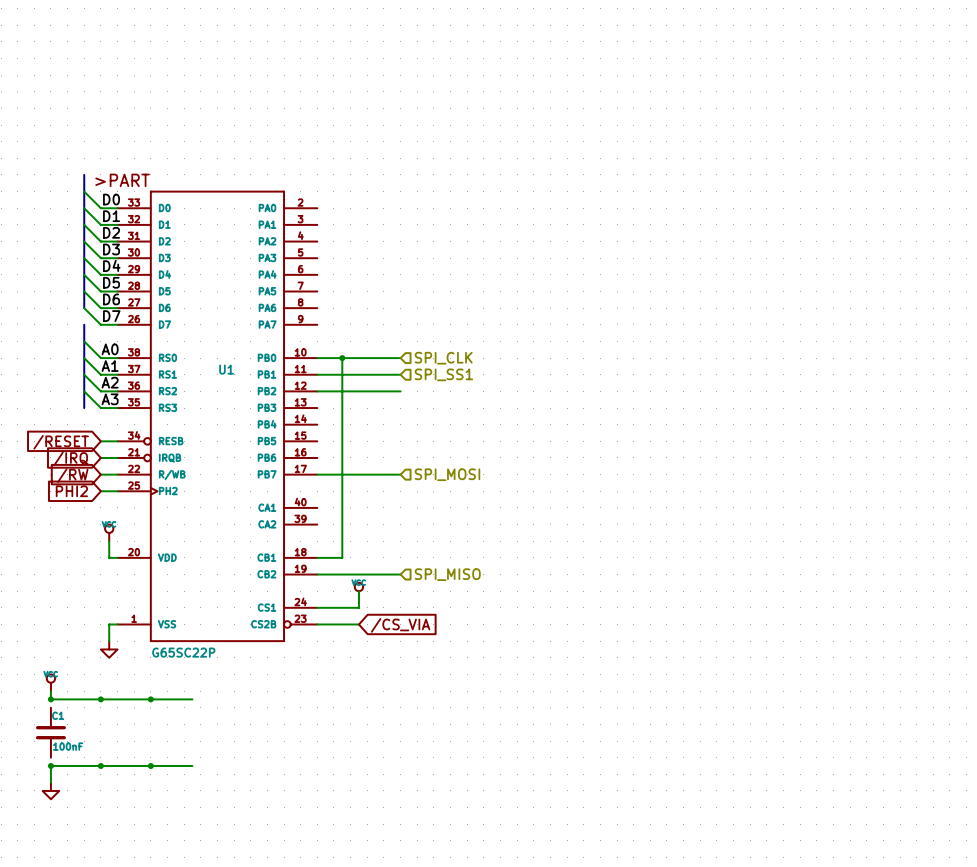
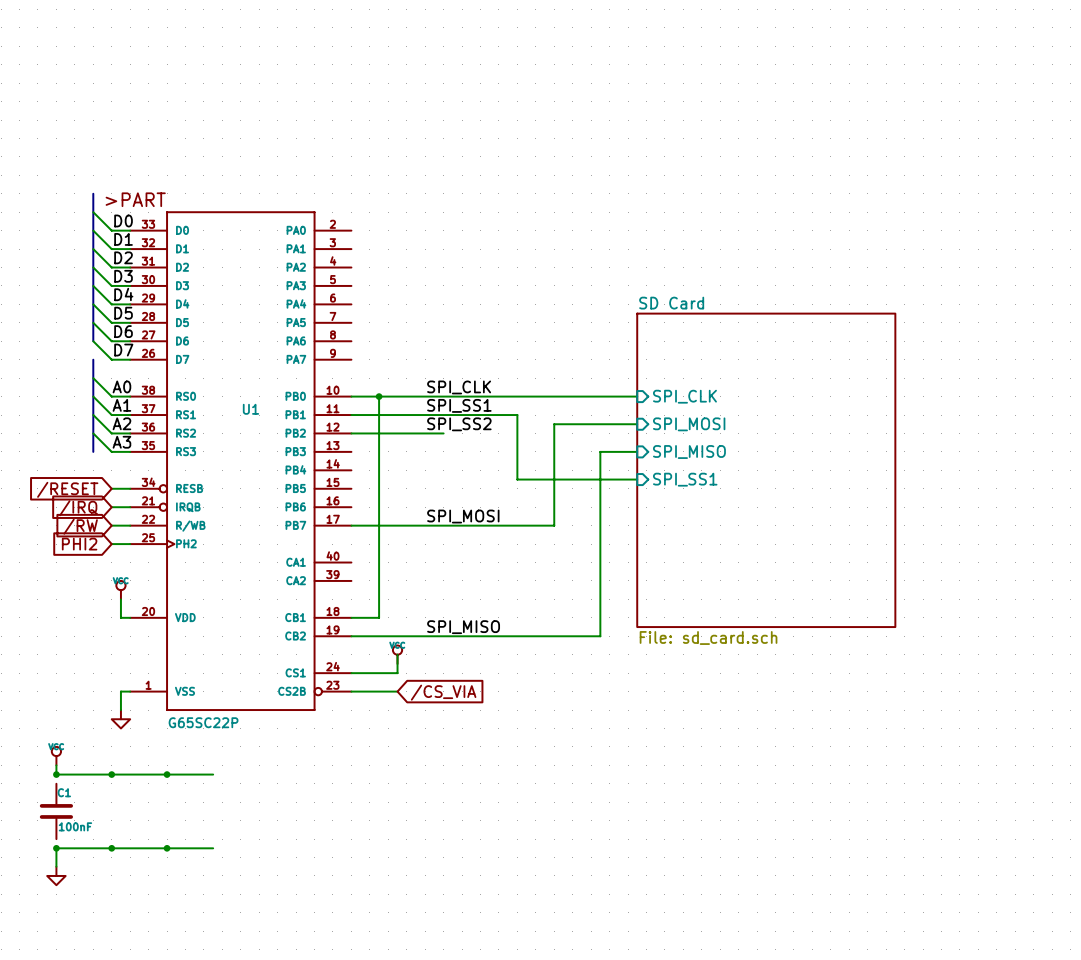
label: none -> SPI_CLK (459, 387)
wire: none -> (443, 396) (637, 396)
hierarchical label: SPI_CLK (443, 358) -> none
sheet pin: none -> SPI_CLK (684, 396)
label: none -> SPI_SS1 (459, 405)
wire: none -> (443, 415) (517, 415) (517, 479) (637, 479)
hierarchical label: SPI_SS1 (443, 374) -> none
label: none -> SPI_SS2 (459, 424)
wire: none -> (637, 424) (554, 424) (554, 525) (443, 525)
sheet pin: none -> SPI_MOSI (689, 424)
wire: none -> (637, 451) (600, 451) (600, 636) (443, 636)
sheet pin: none -> SPI_MISO (689, 452)
sheet SD Card: none -> File: sd_card.sch (766, 470)
sheet pin: none -> SPI_SS1 (685, 479)
label: none -> SPI_MOSI (463, 516)
hierarchical label: SPI_MOSI (447, 474) -> none
label: none -> SPI_MISO (463, 627)
hierarchical label: SPI_MISO (447, 574) -> none

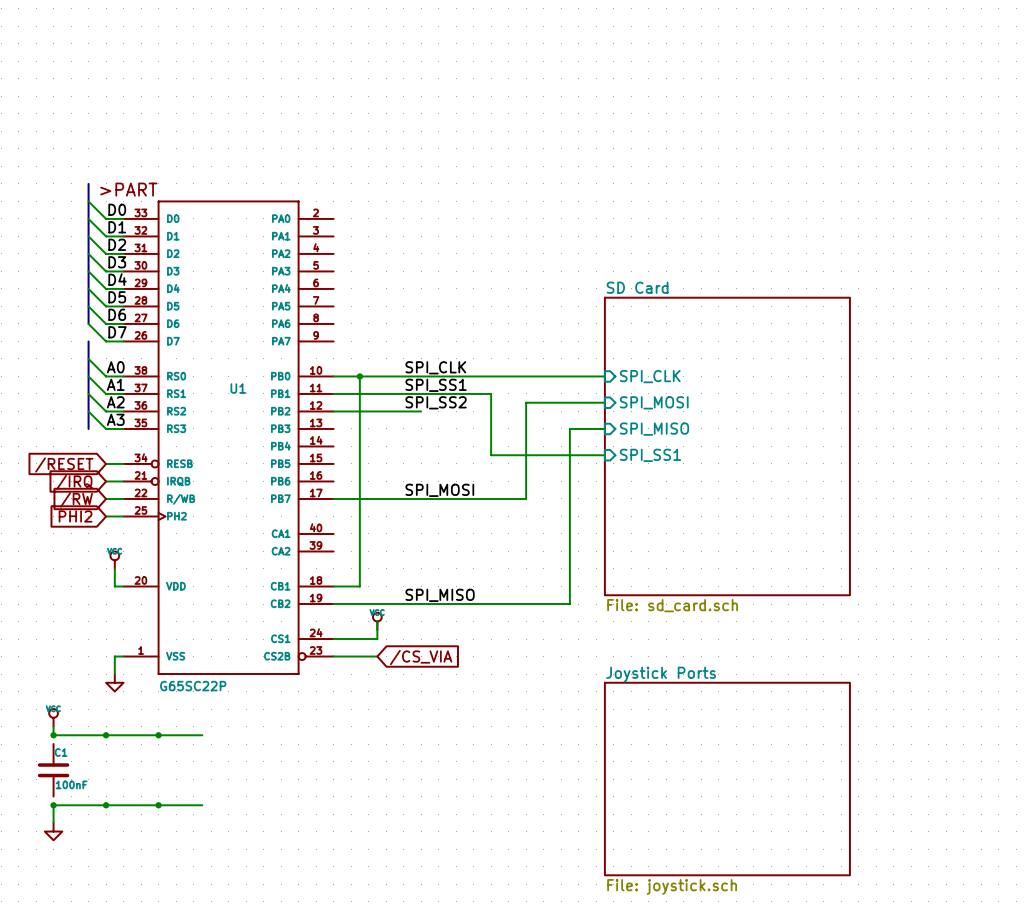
sheet Joystick Ports: none -> File: joystick.sch (727, 779)

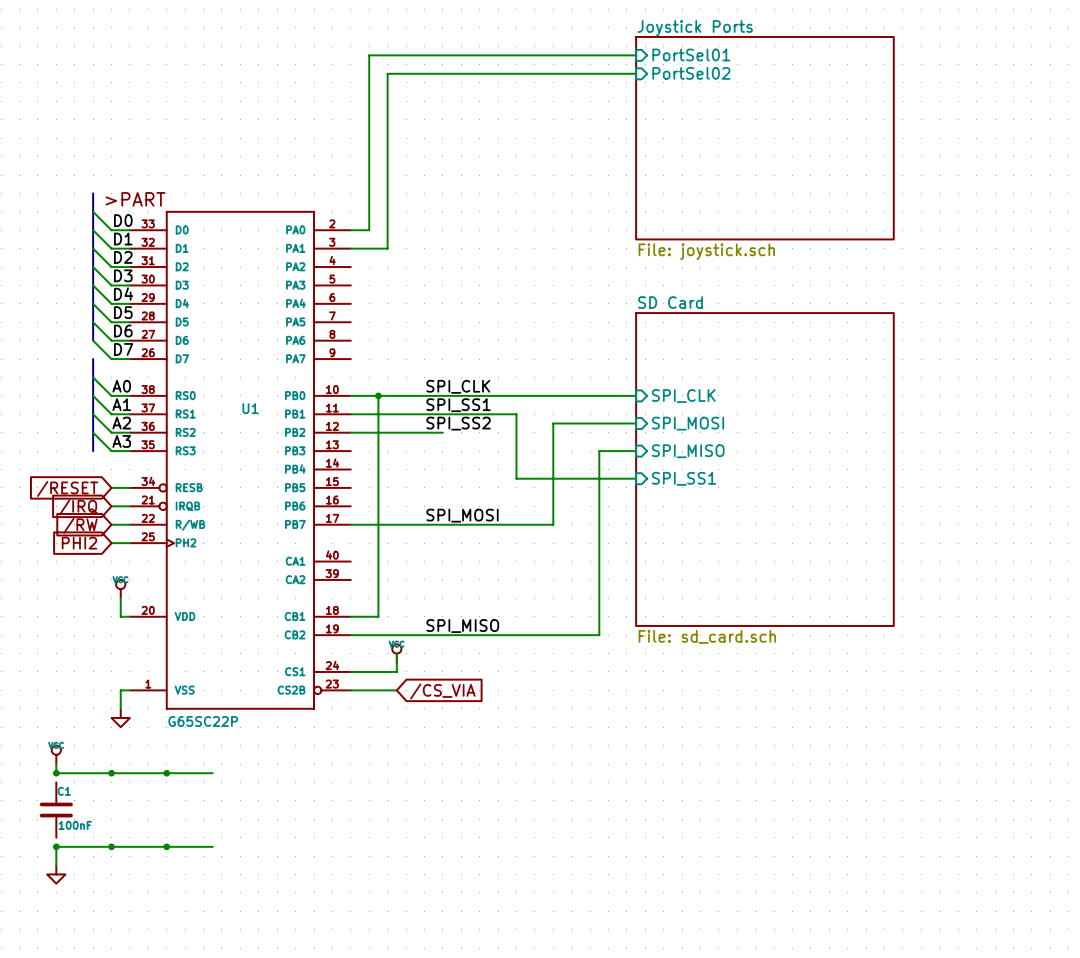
wire: none -> (636, 55) (369, 55) (369, 230) (350, 230)
sheet pin: none -> PortSel01 (691, 54)
sheet pin: none -> PortSel02 (691, 73)
wire: none -> (636, 73) (387, 73) (387, 248) (350, 248)
sheet Joystick Ports: none -> File: joystick.sch (764, 138)
sheet Joystick Ports: File: joystick.sch (727, 779) -> none

